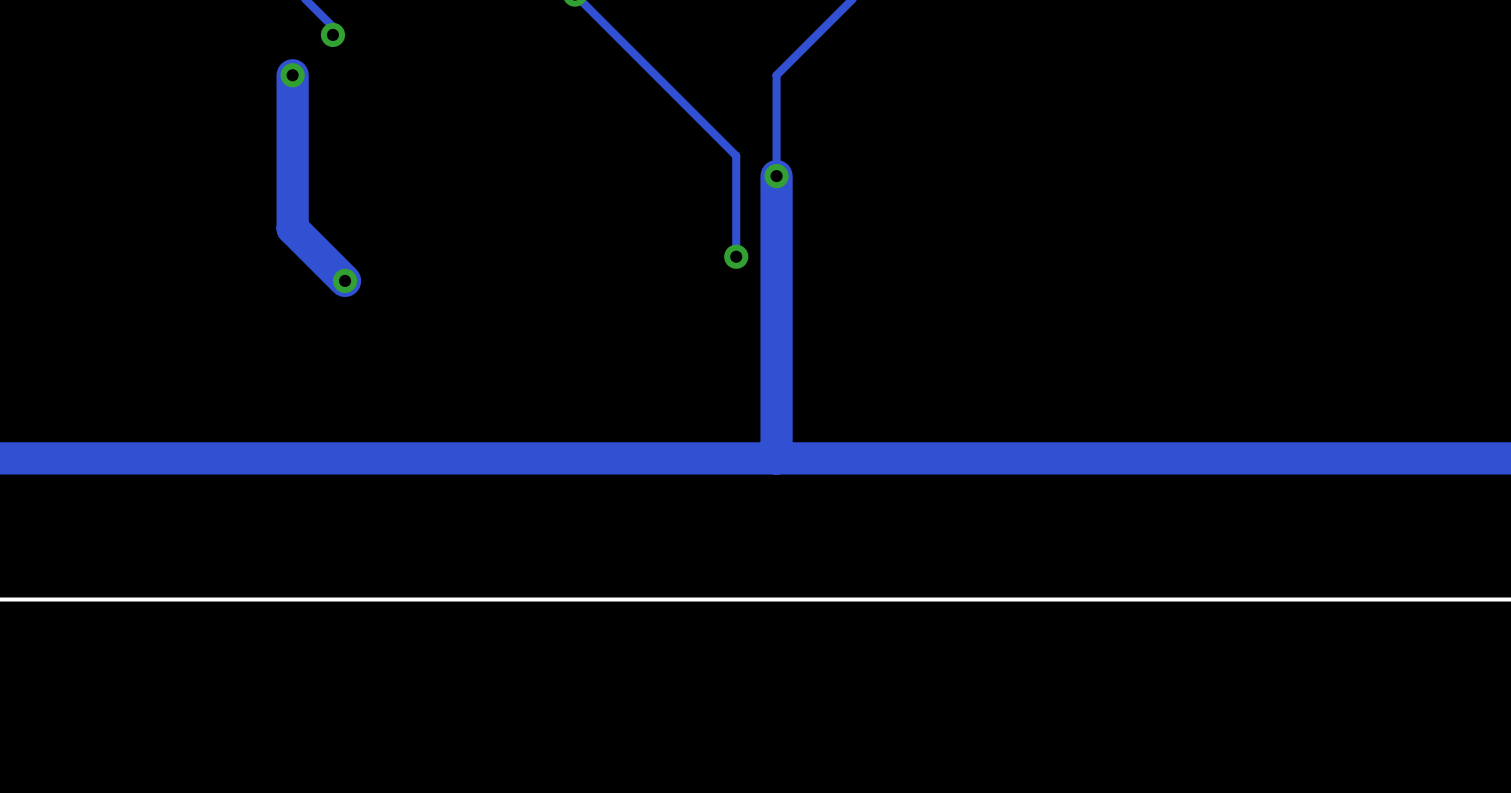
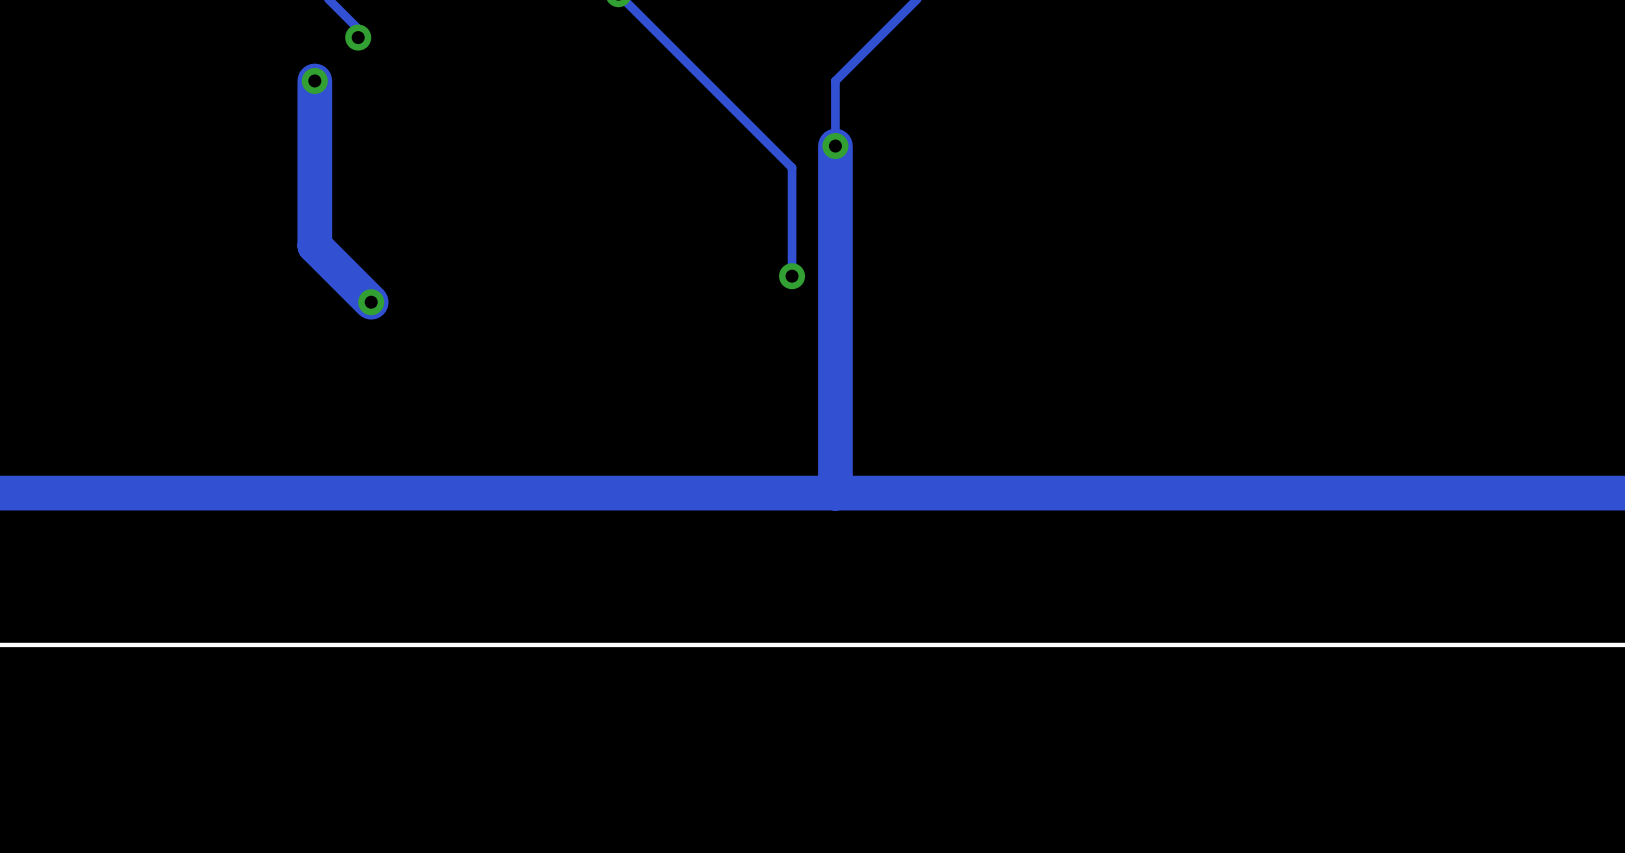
track width: thin (776, 135) (776, 176) -> thick (835, 146) (835, 189)
via position: (776, 176) -> (835, 146)

